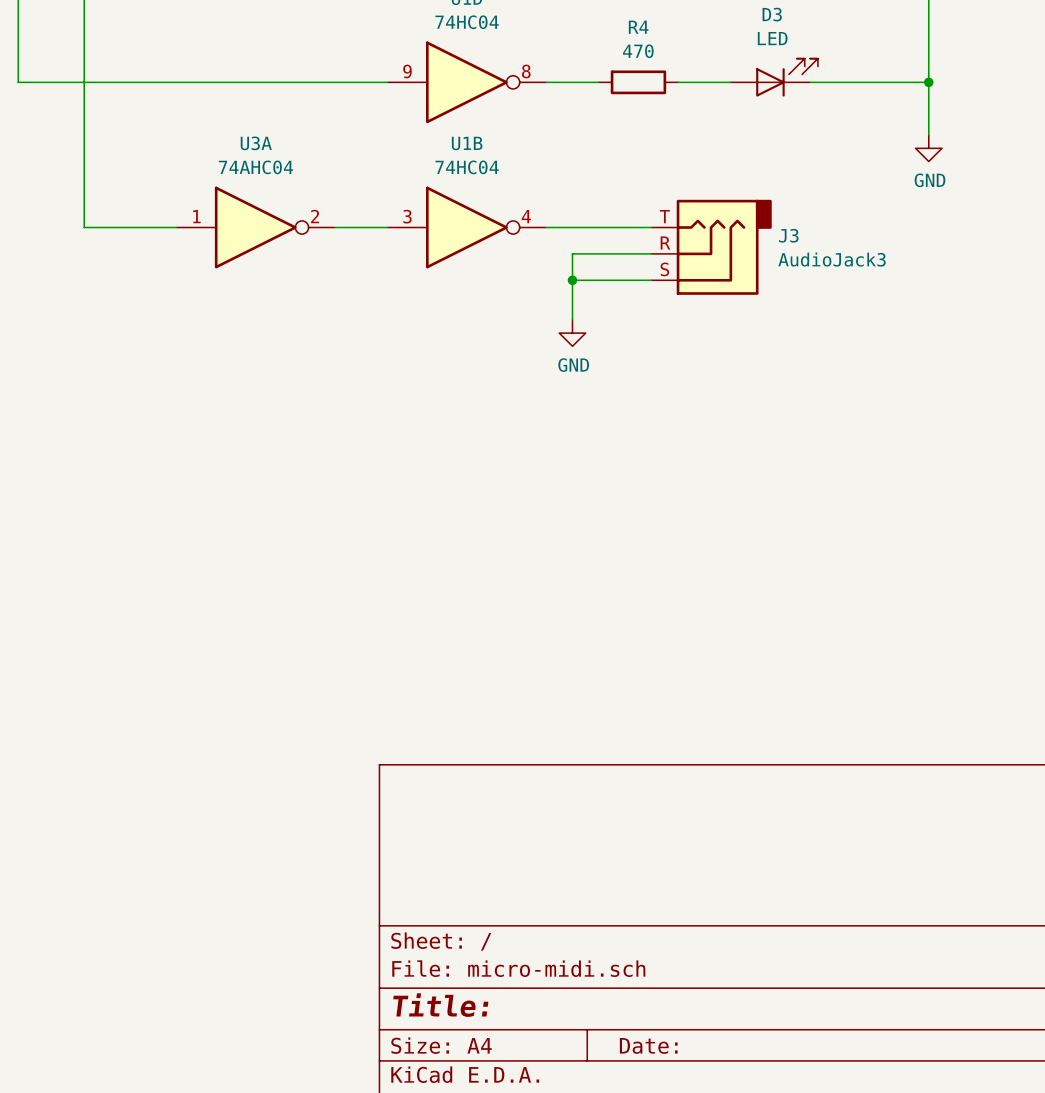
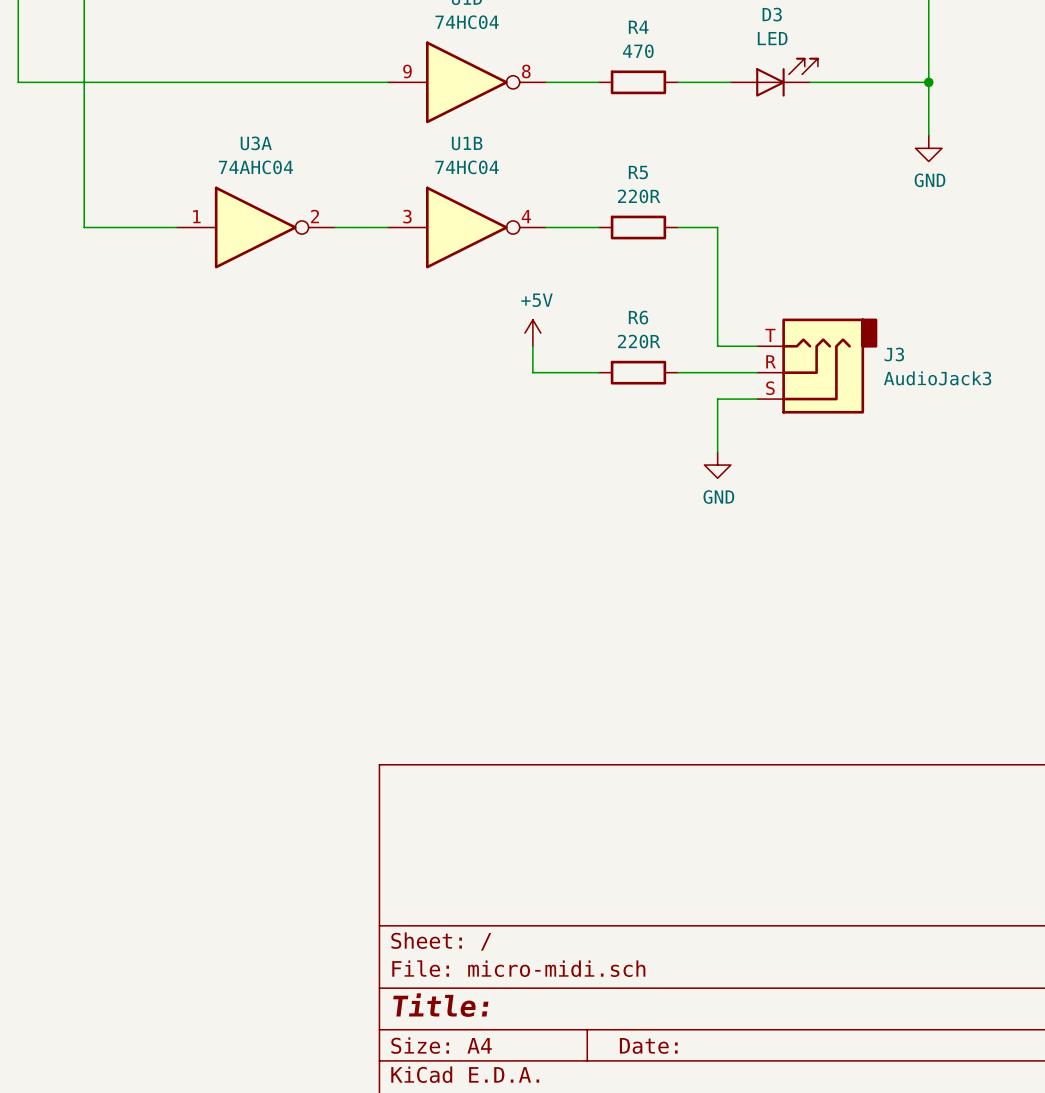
wire: (598, 227) (651, 227) -> none
R5: none -> 220R (638, 227)
wire: none -> (678, 227) (717, 227) (717, 346) (757, 346)
J3 position: (711, 247) -> (817, 366)
wire: (651, 253) (572, 253) (572, 319) -> none
wire: (572, 280) (651, 280) -> (678, 372) (757, 372)
junction: (572, 280) -> none
power symbol: none -> +5V (532, 333)
power symbol position: GND (572, 333) -> GND (717, 465)
wire: none -> (532, 346) (532, 372) (598, 372)
R6: none -> 220R (638, 372)
wire: none -> (757, 399) (717, 399) (717, 451)

